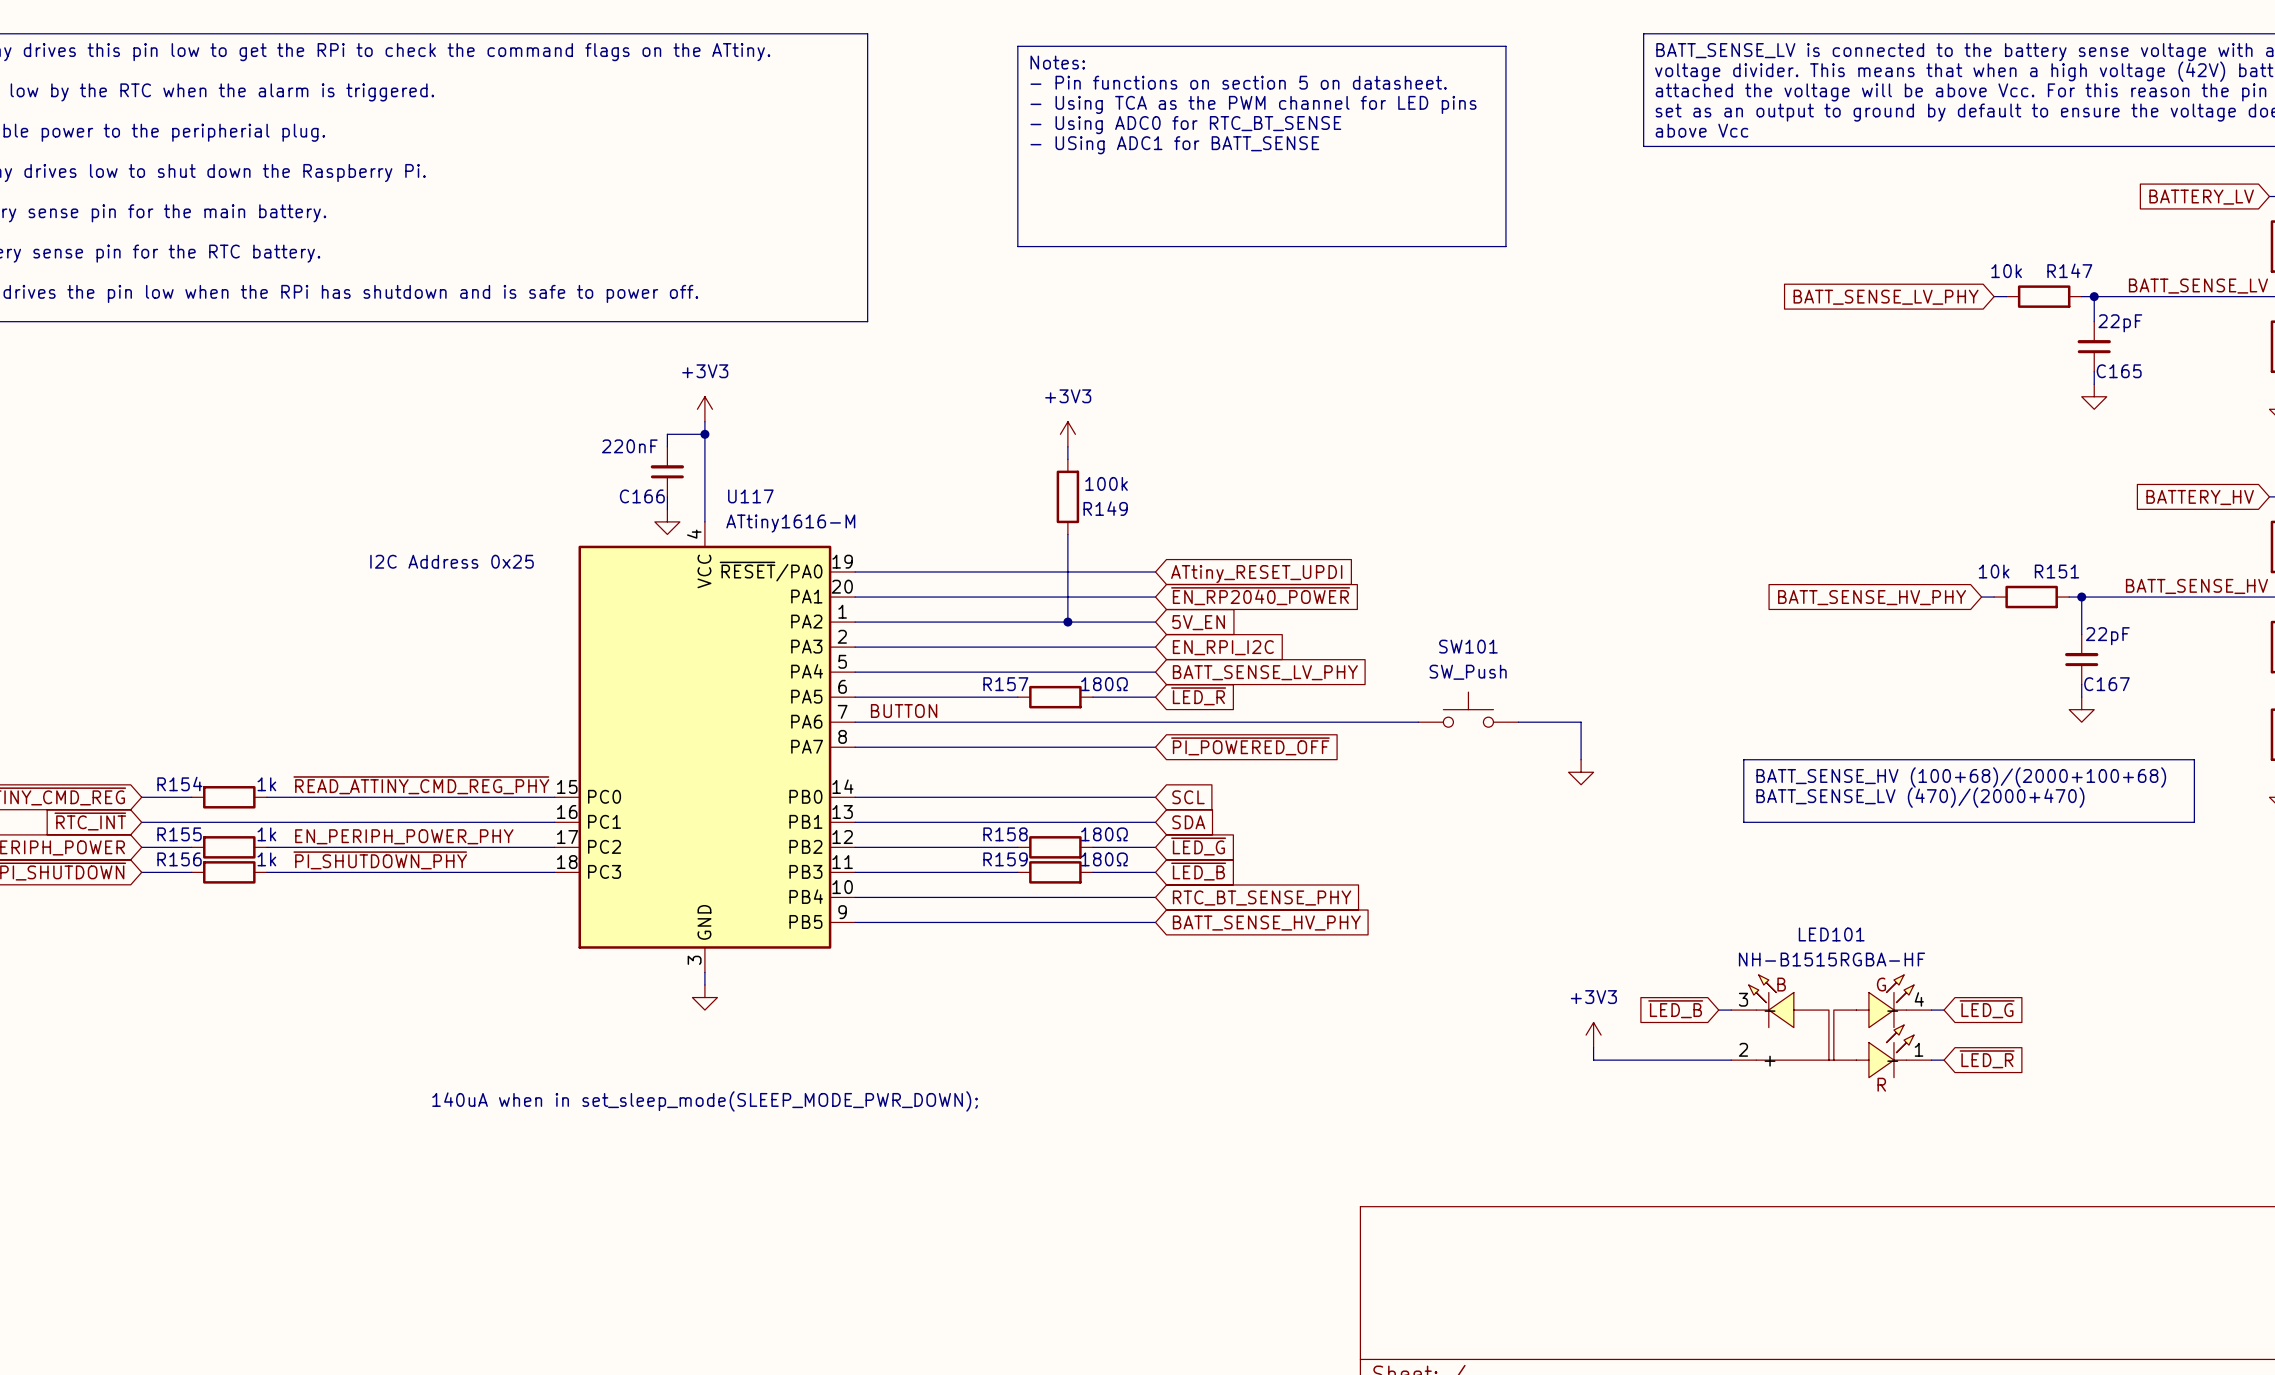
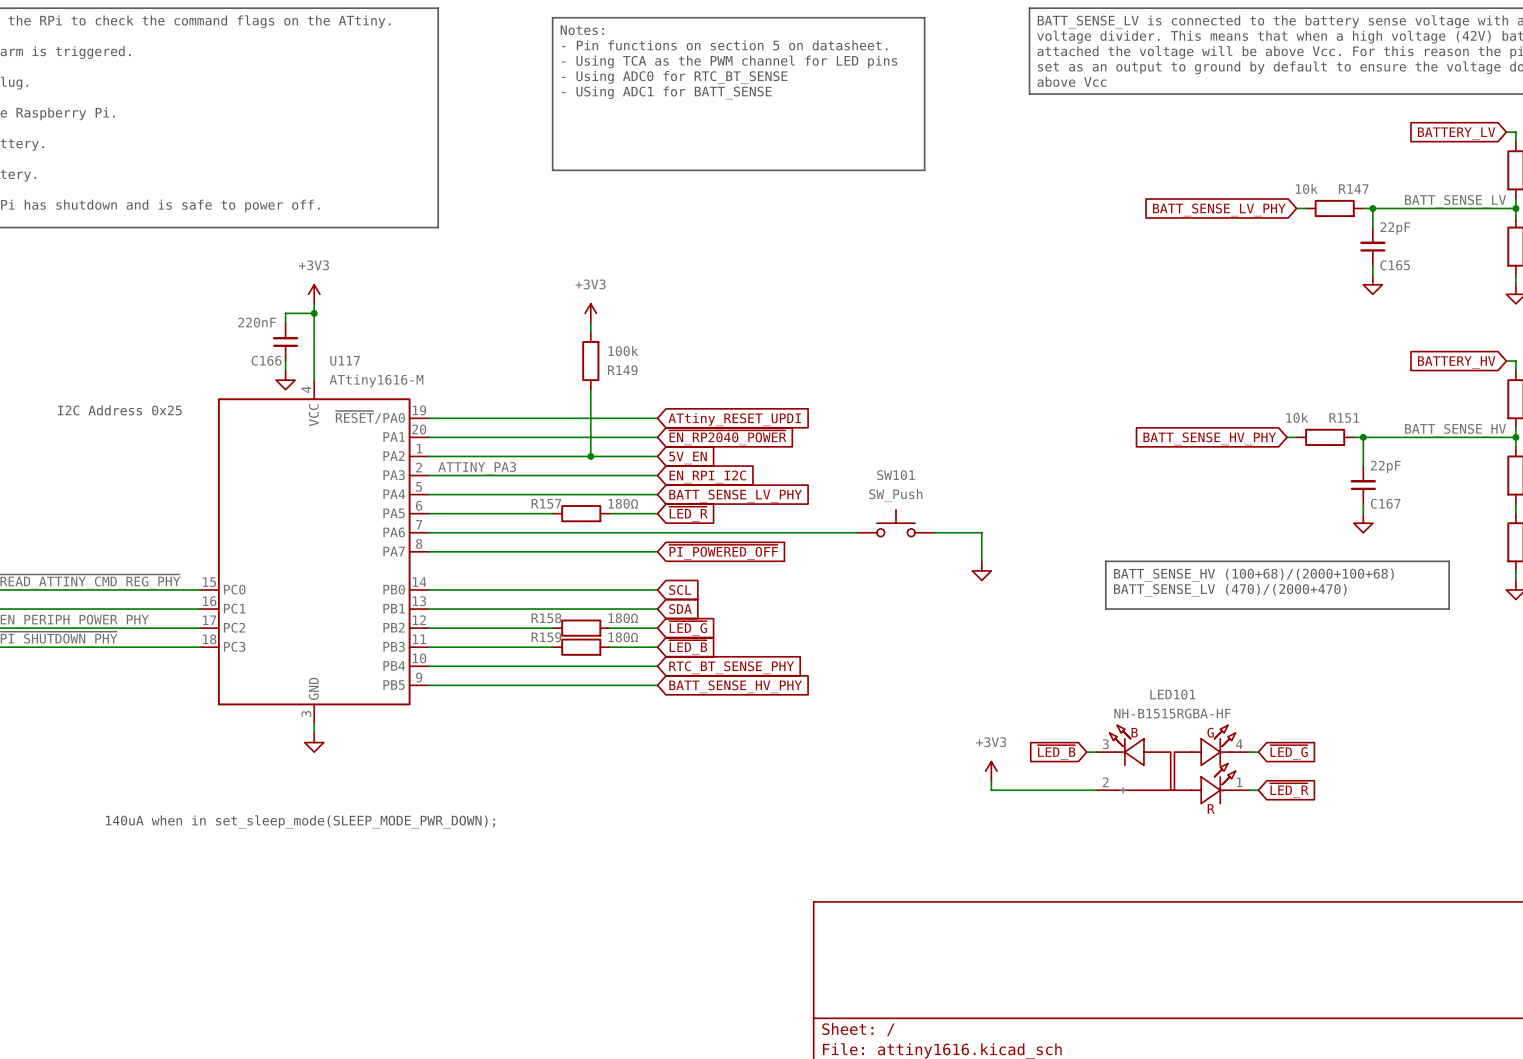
label: none -> ATTINY_PA3 (477, 468)
label: BUTTON (904, 711) -> none

